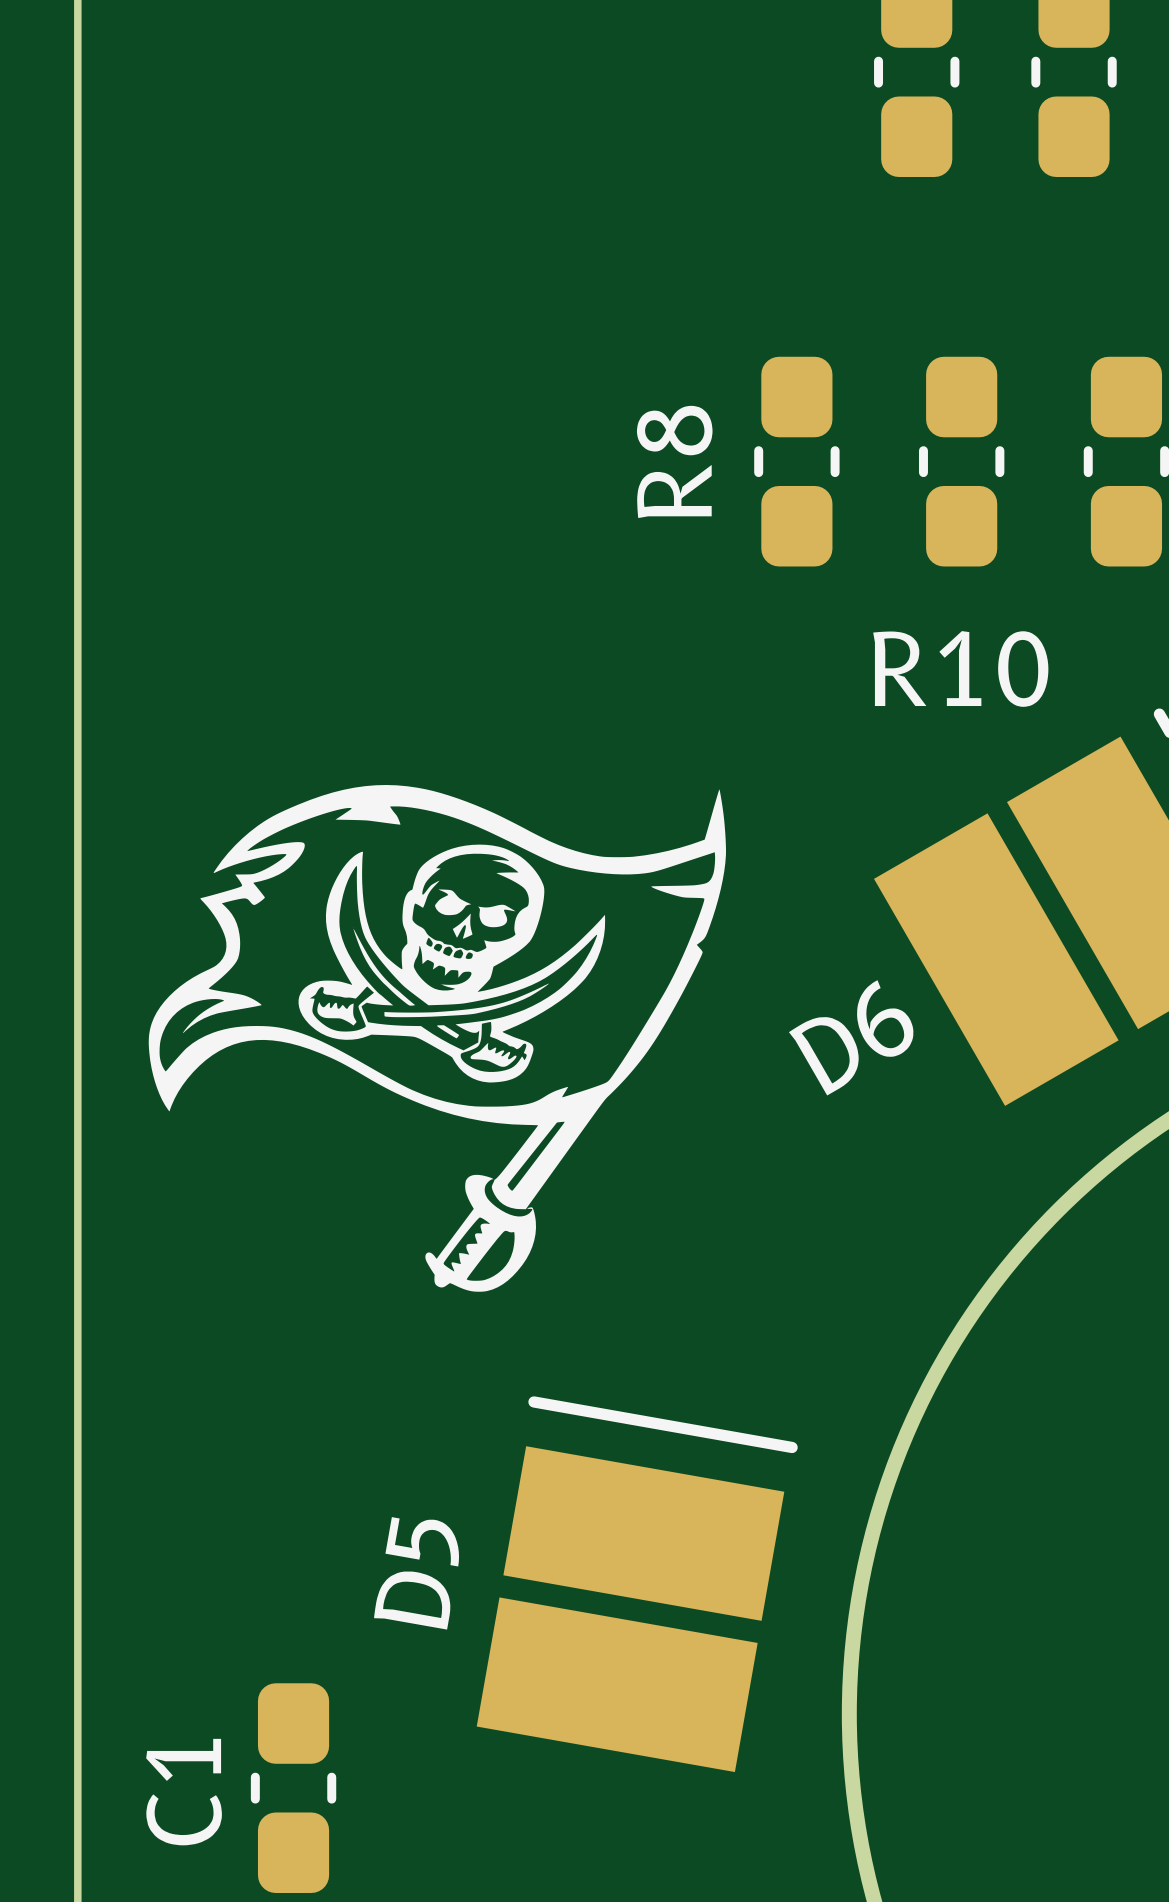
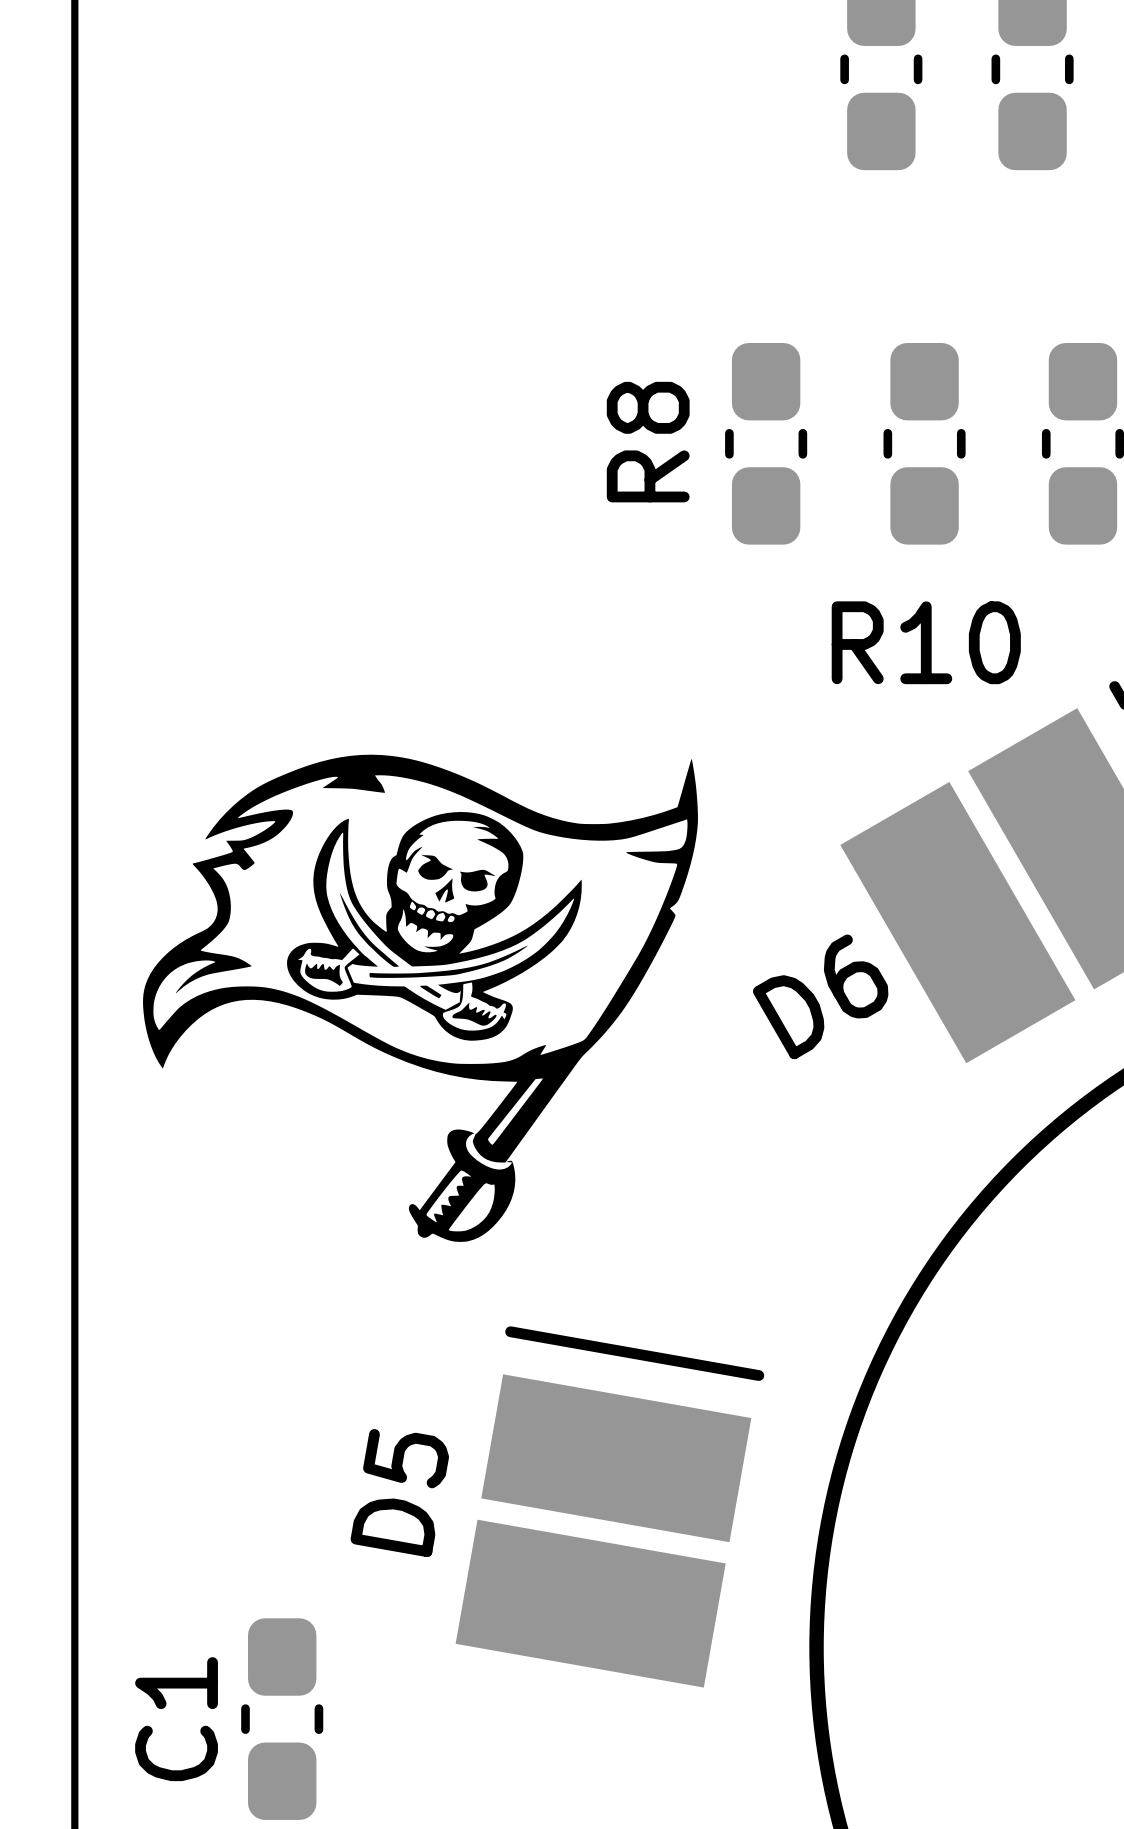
D5 position: (637, 1584) -> (609, 1506)

